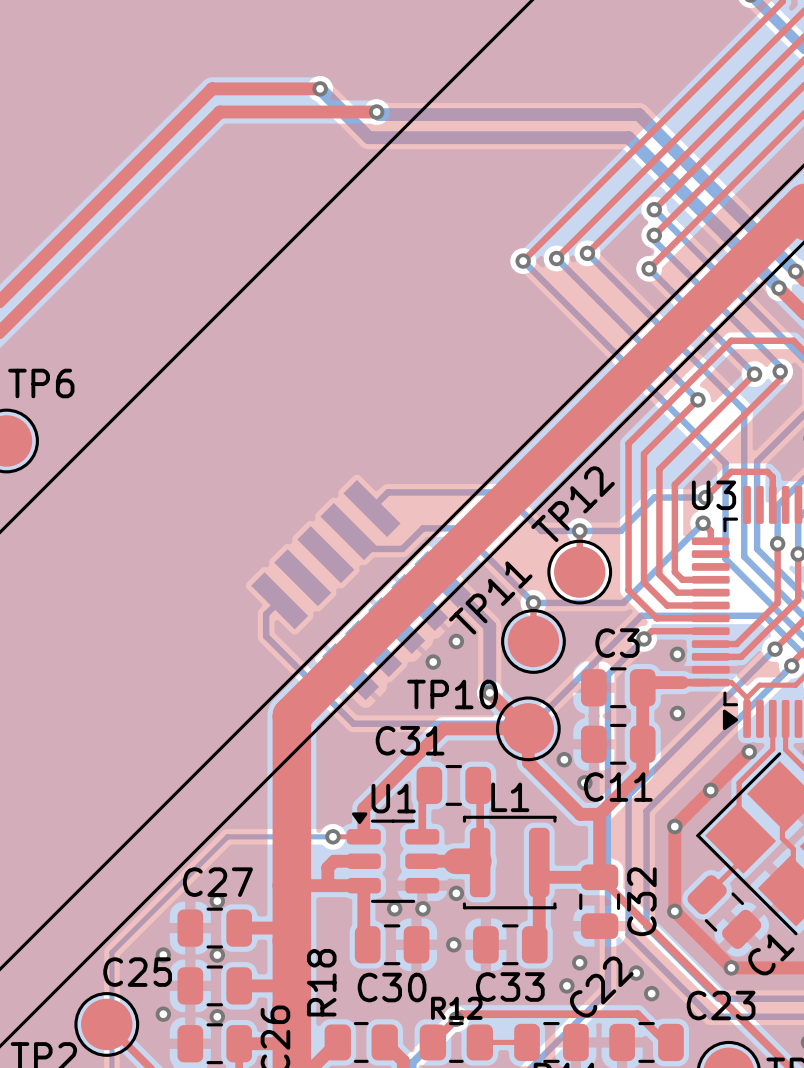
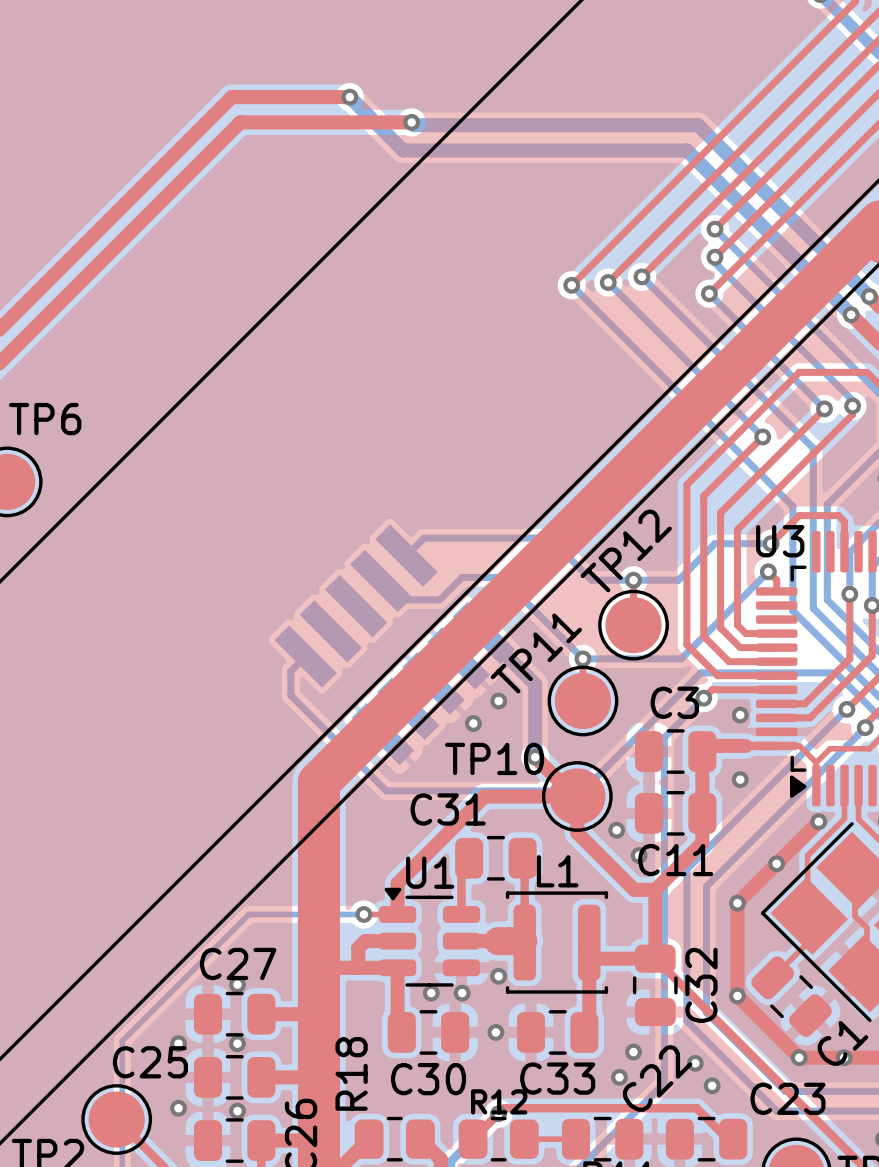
via: none -> (844, 1057)

